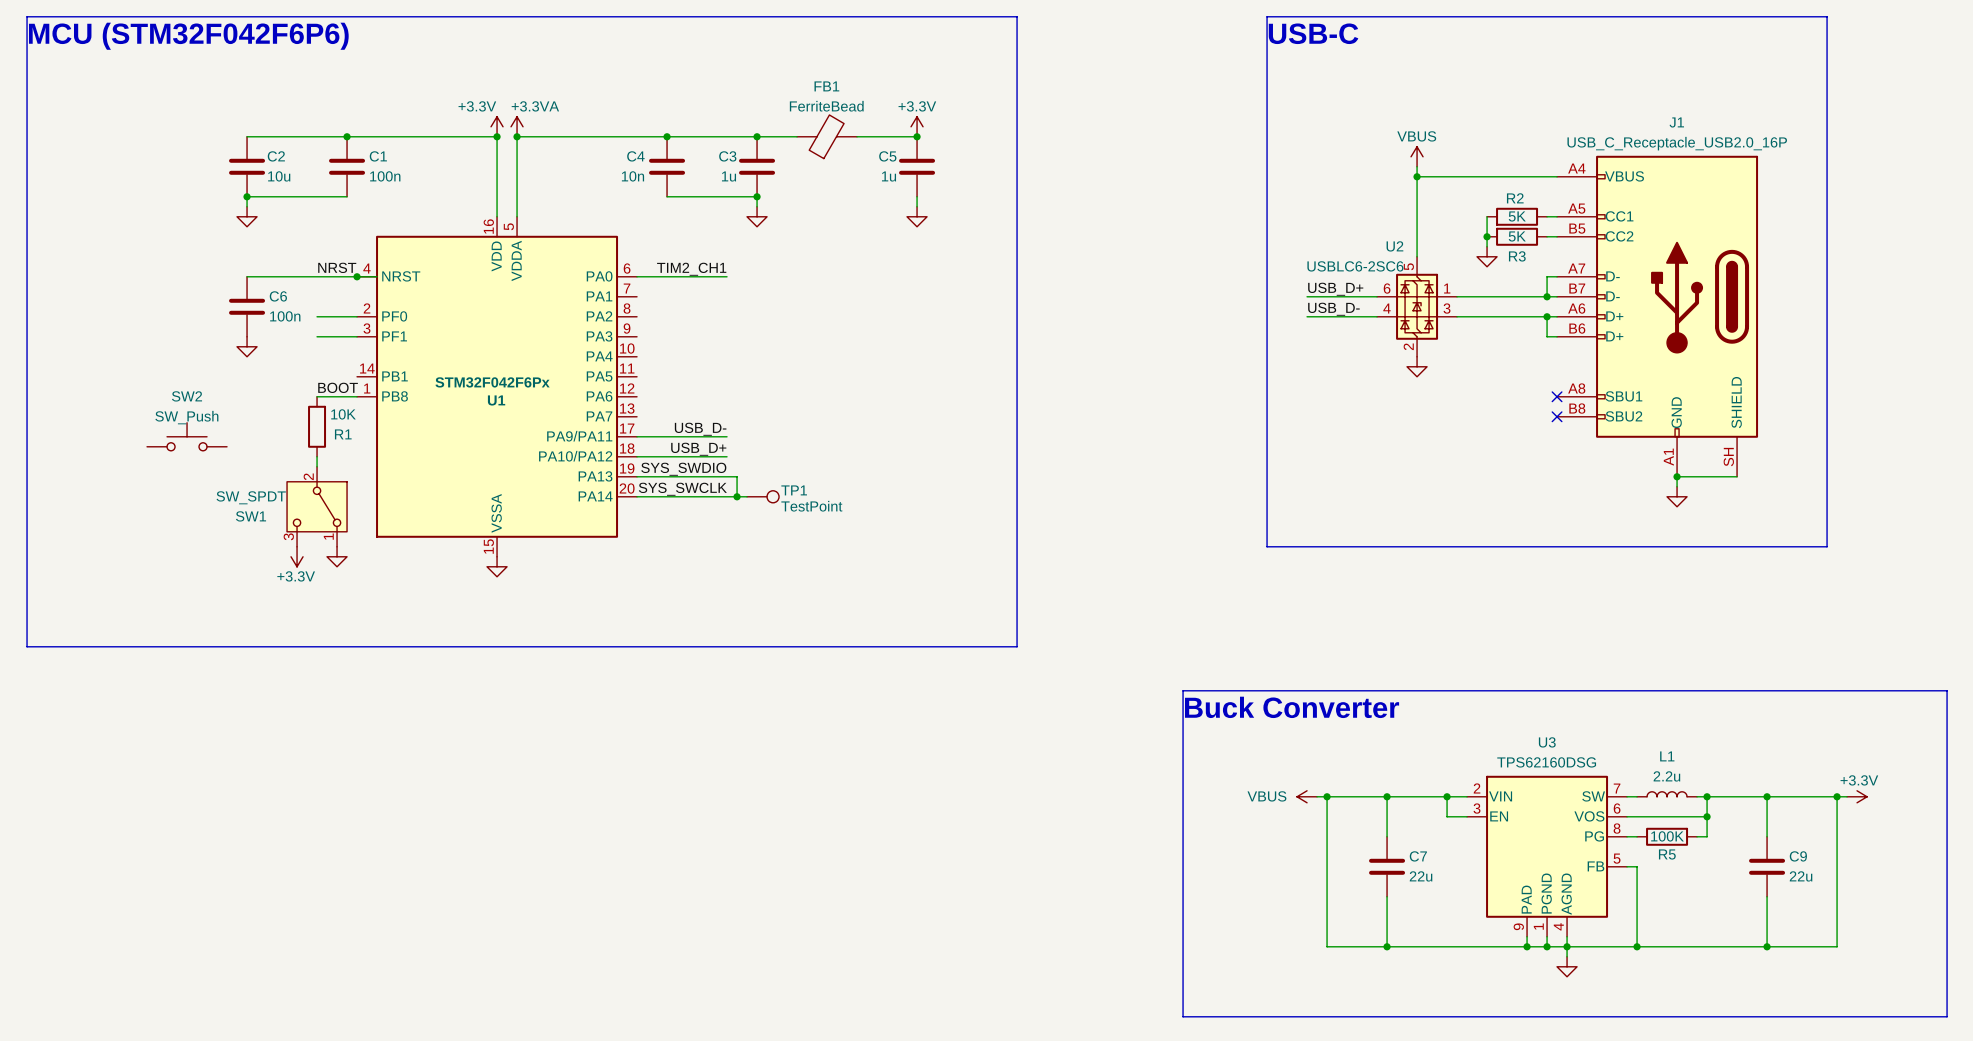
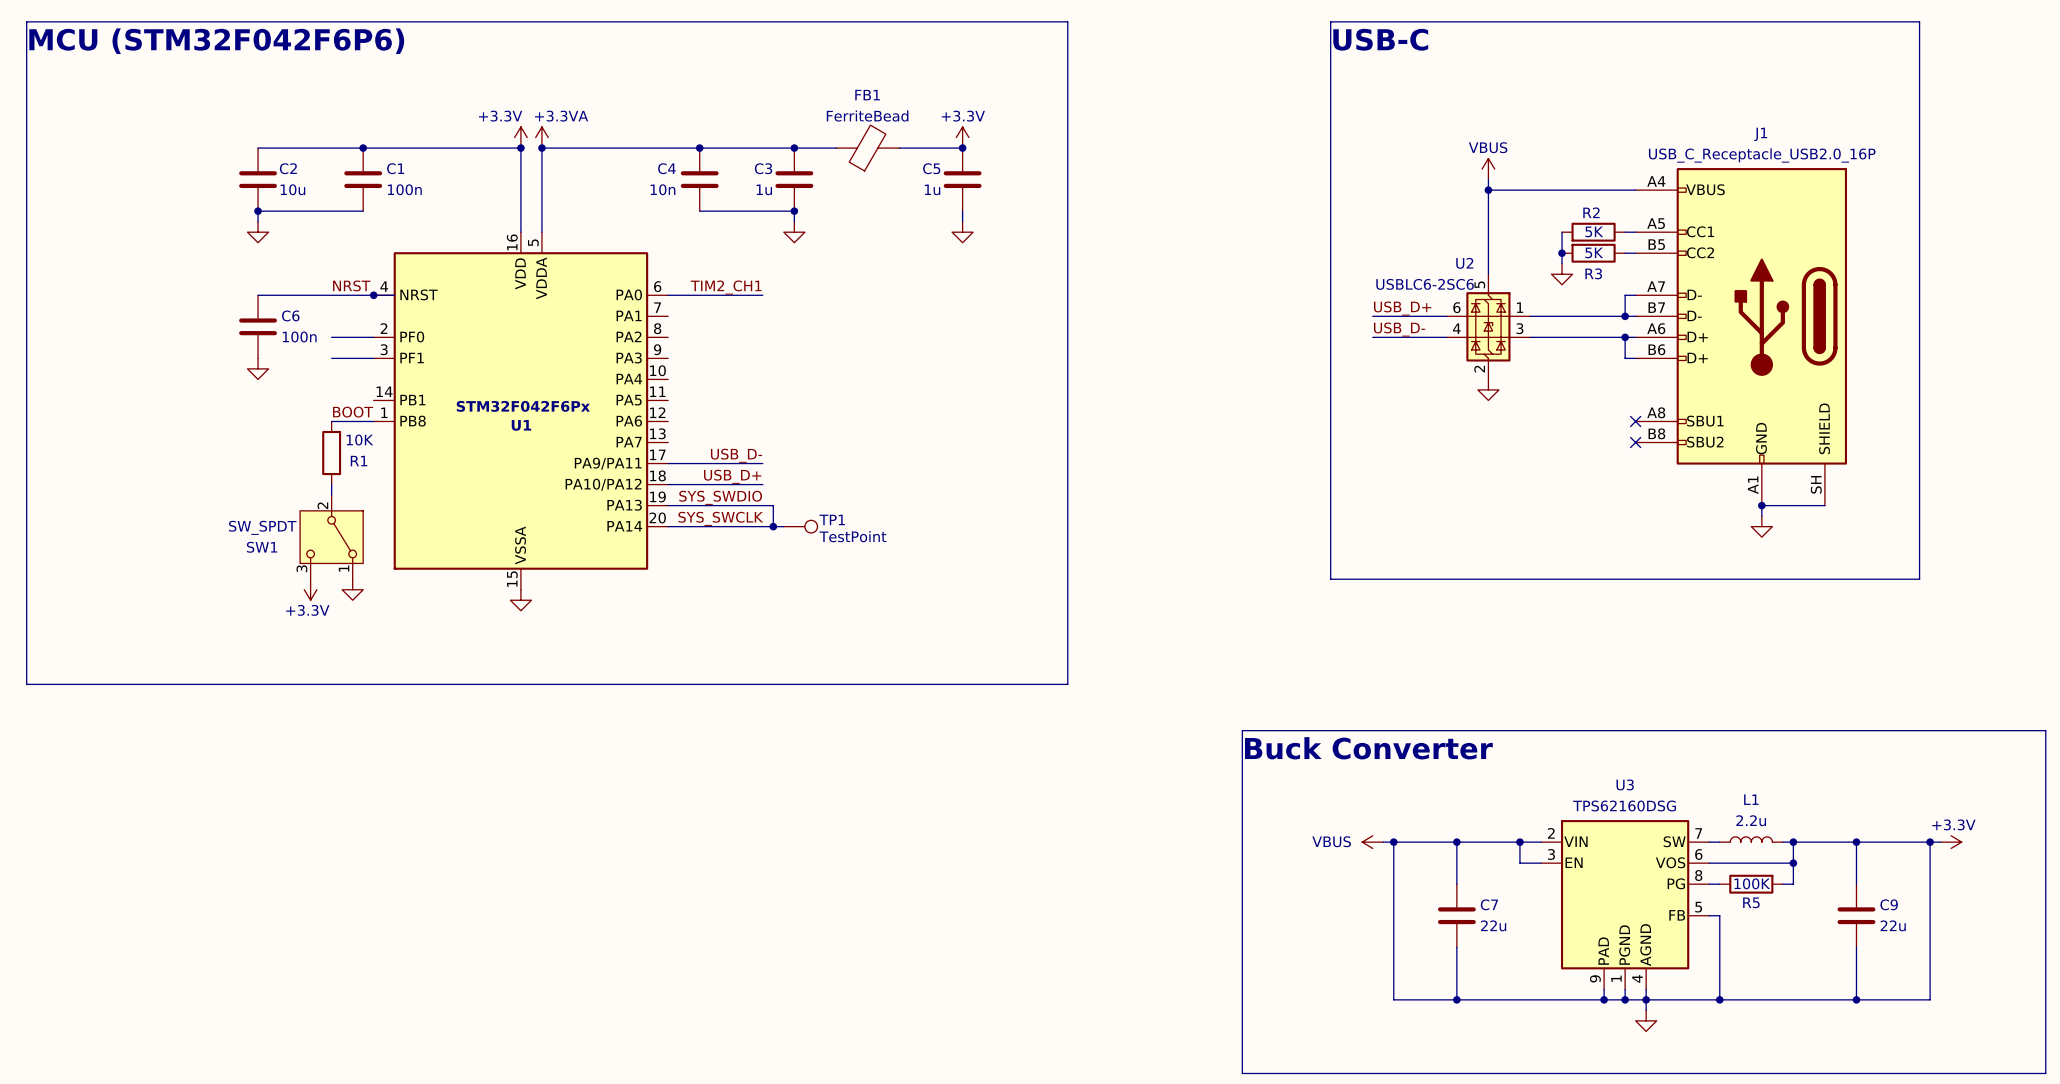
SW2: SW_Push (187, 436) -> none

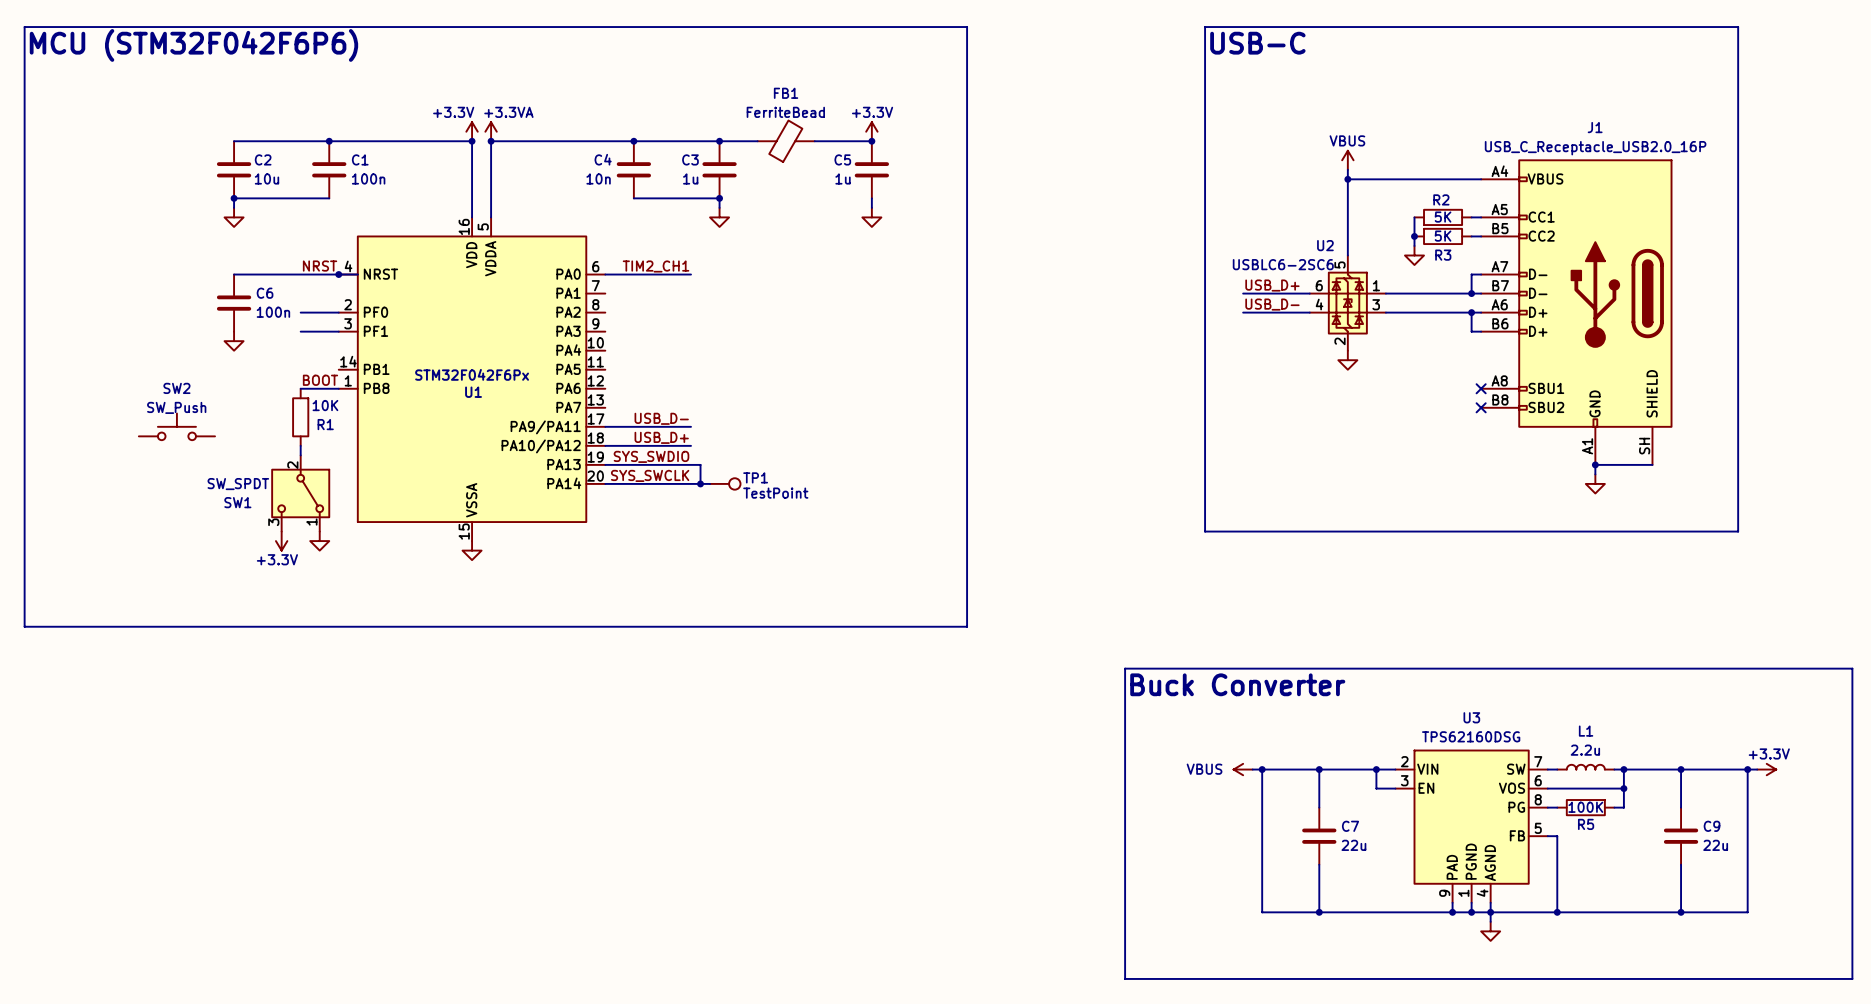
SW2: none -> SW_Push (176, 426)

